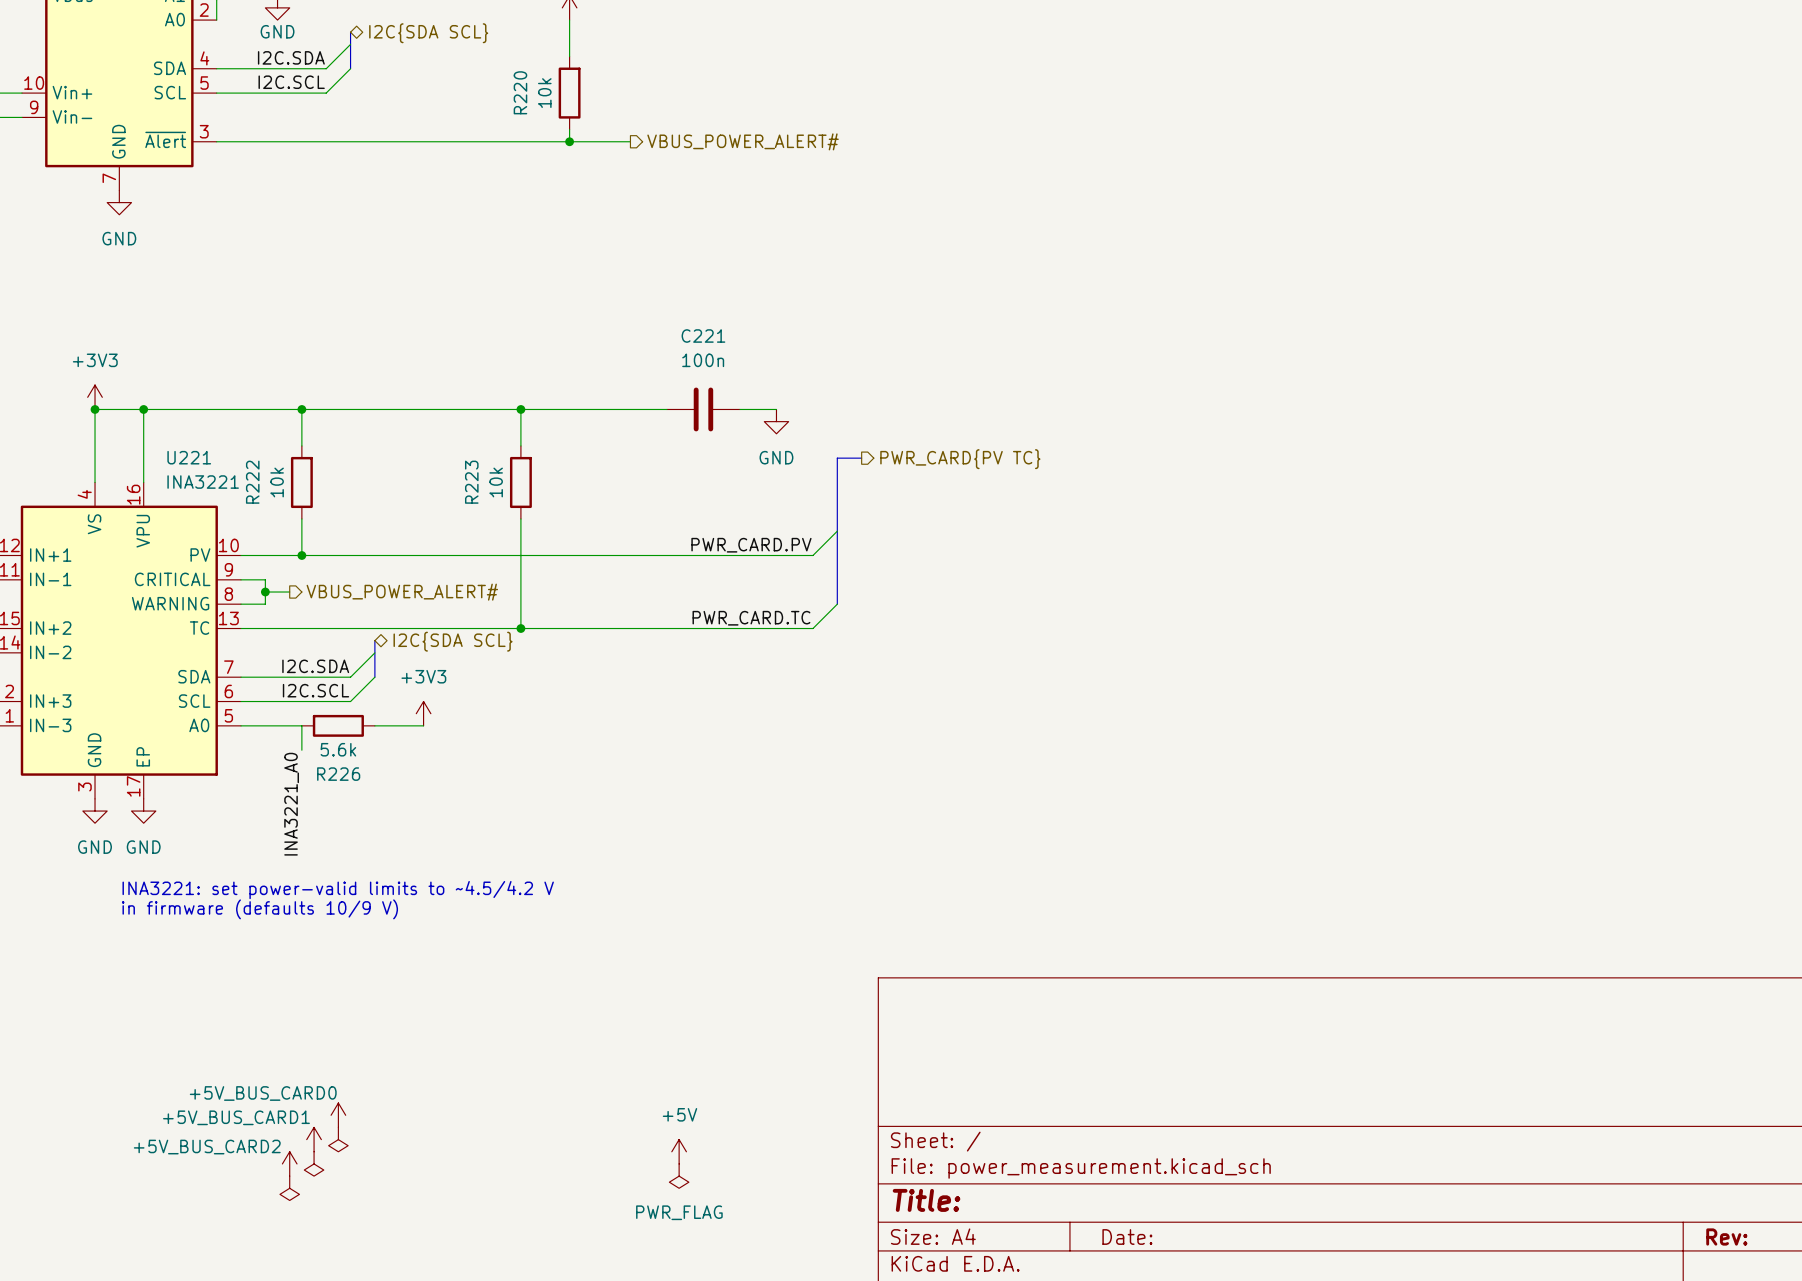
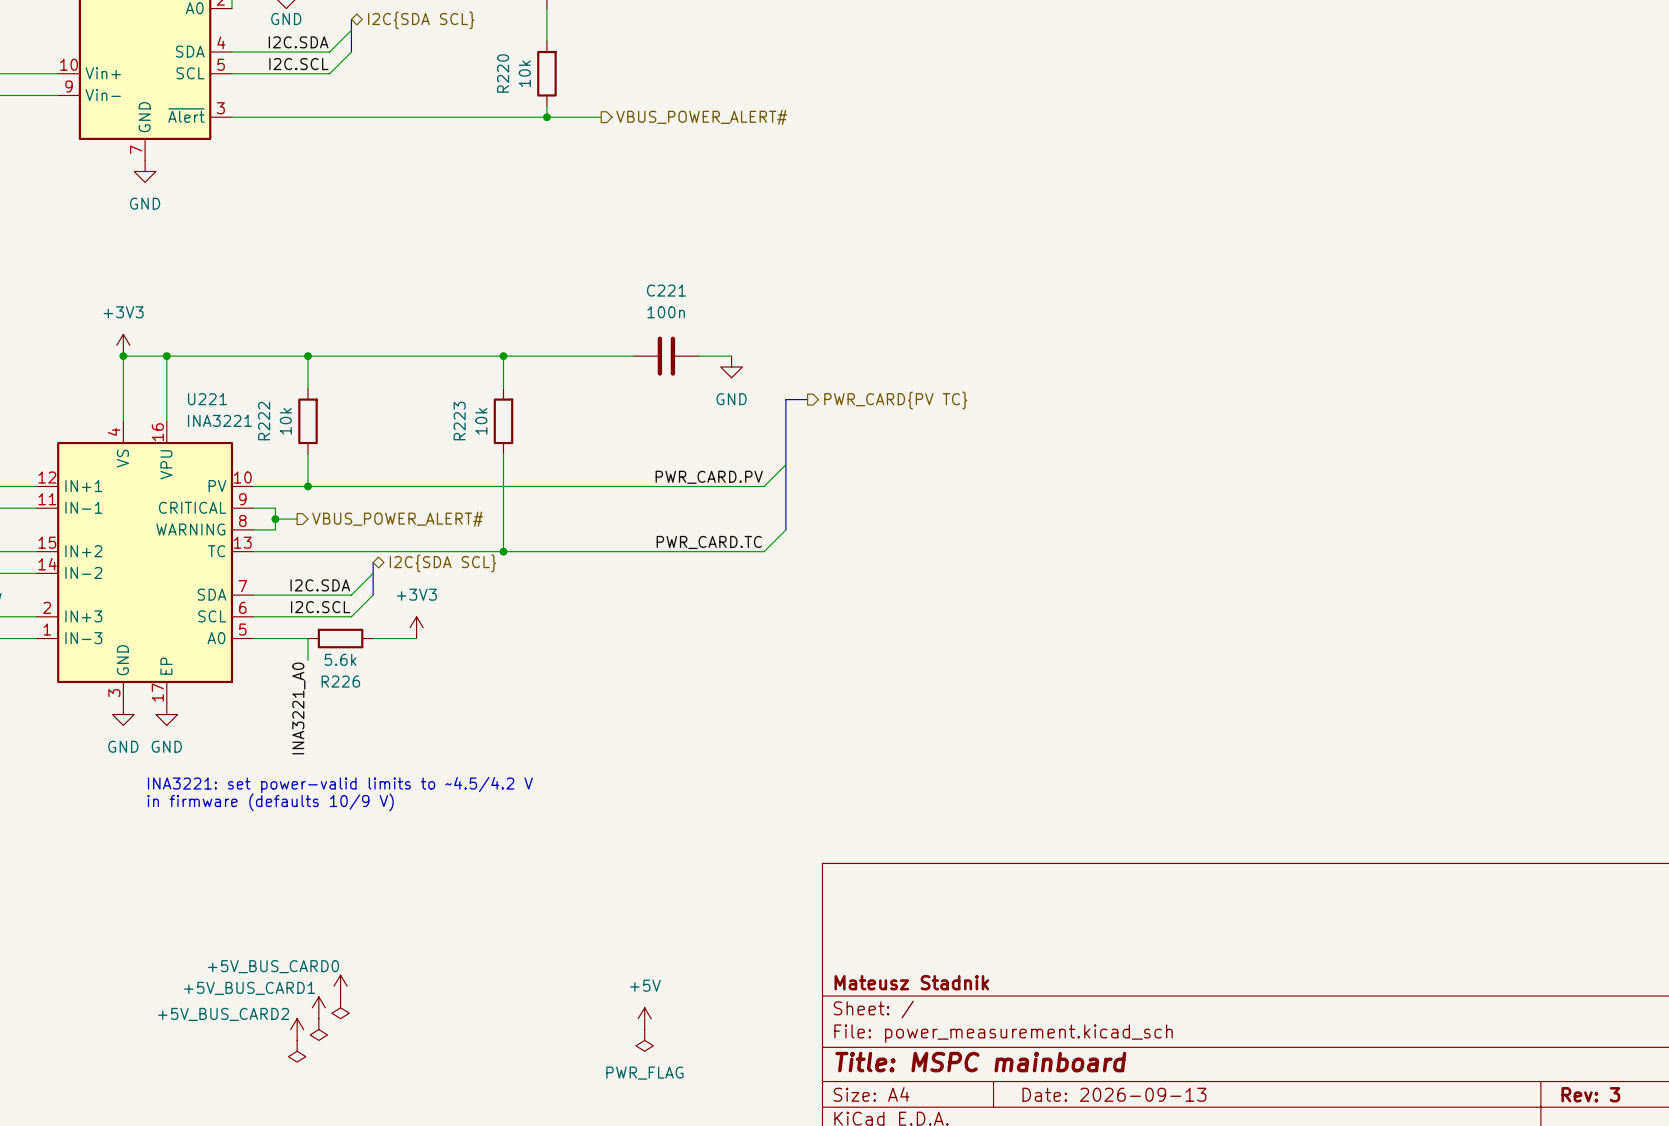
title block: none -> Mateusz Stadnik (911, 982)
title block: Title: (926, 1200) -> Title: MSPC mainboard (980, 1062)
title block: Date: (1127, 1237) -> Date: 2026-09-13 (1114, 1094)
title block: Rev: (1726, 1237) -> Rev: 3 (1590, 1094)

